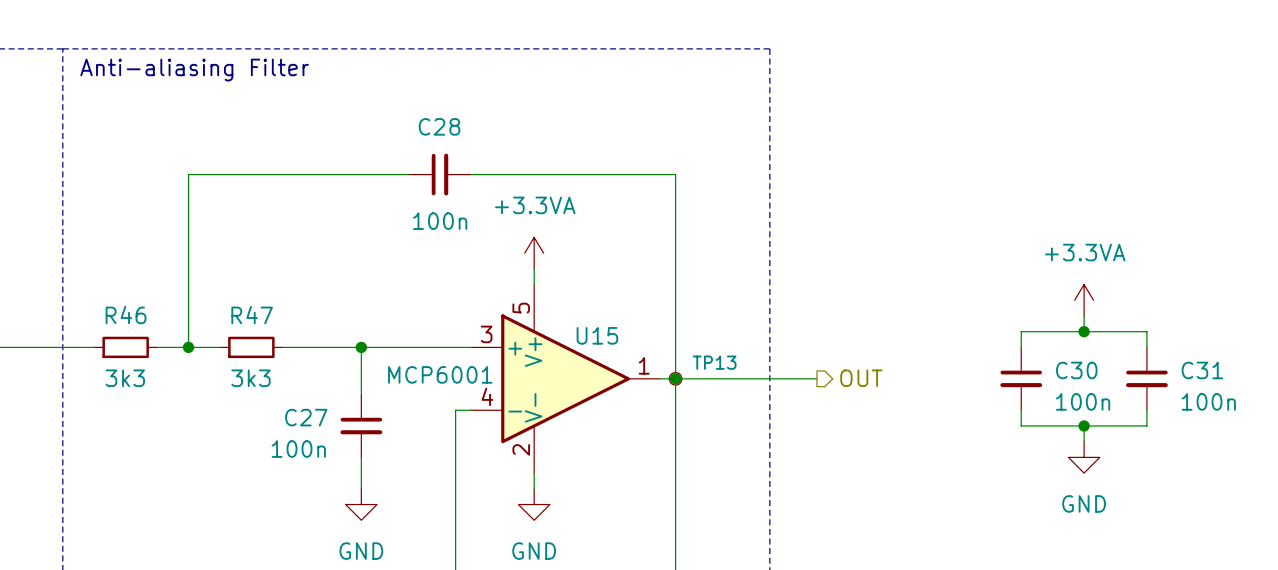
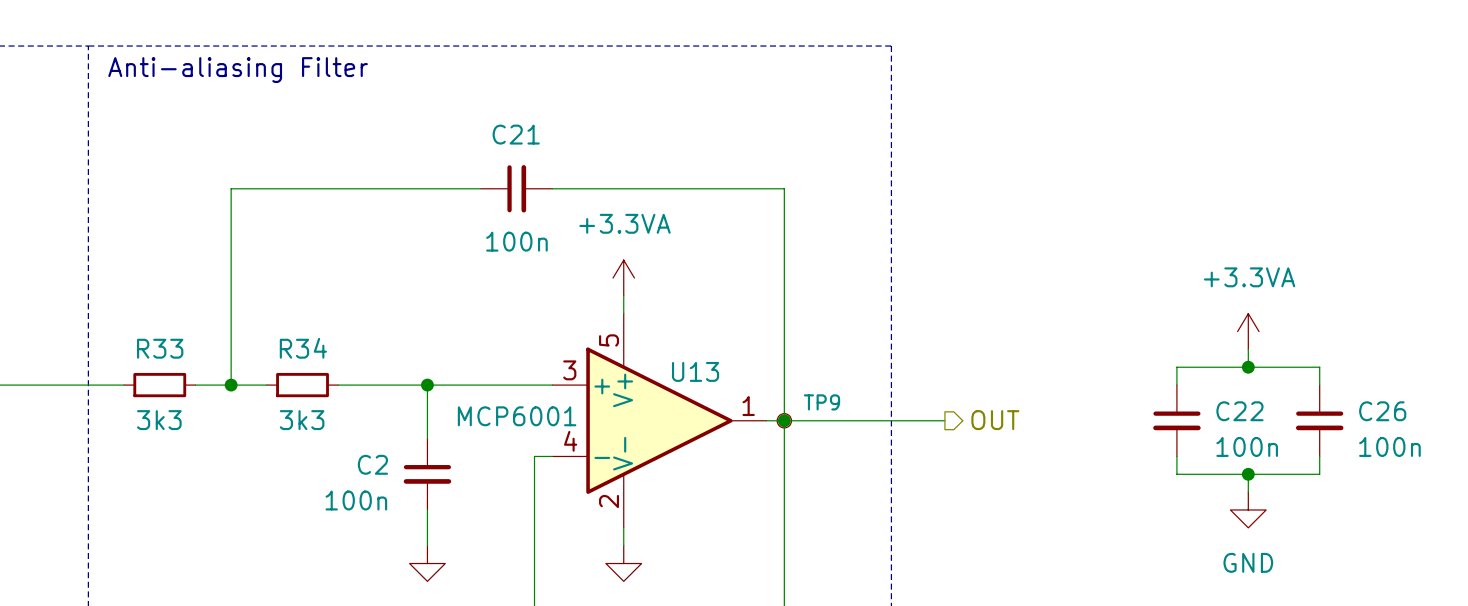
C28 name: C28 (439, 126) -> C21 (516, 134)
R46 name: R46 (126, 315) -> R33 (160, 348)
R47 name: R47 (252, 315) -> R34 (303, 348)
U15 name: U15 (597, 335) -> U13 (695, 371)
TP13 name: TP13 (714, 362) -> TP9 (822, 402)
C30 name: C30 (1076, 370) -> C22 (1239, 411)
C31 name: C31 (1202, 370) -> C26 (1382, 411)
C27 name: C27 (306, 417) -> C2 (372, 464)

